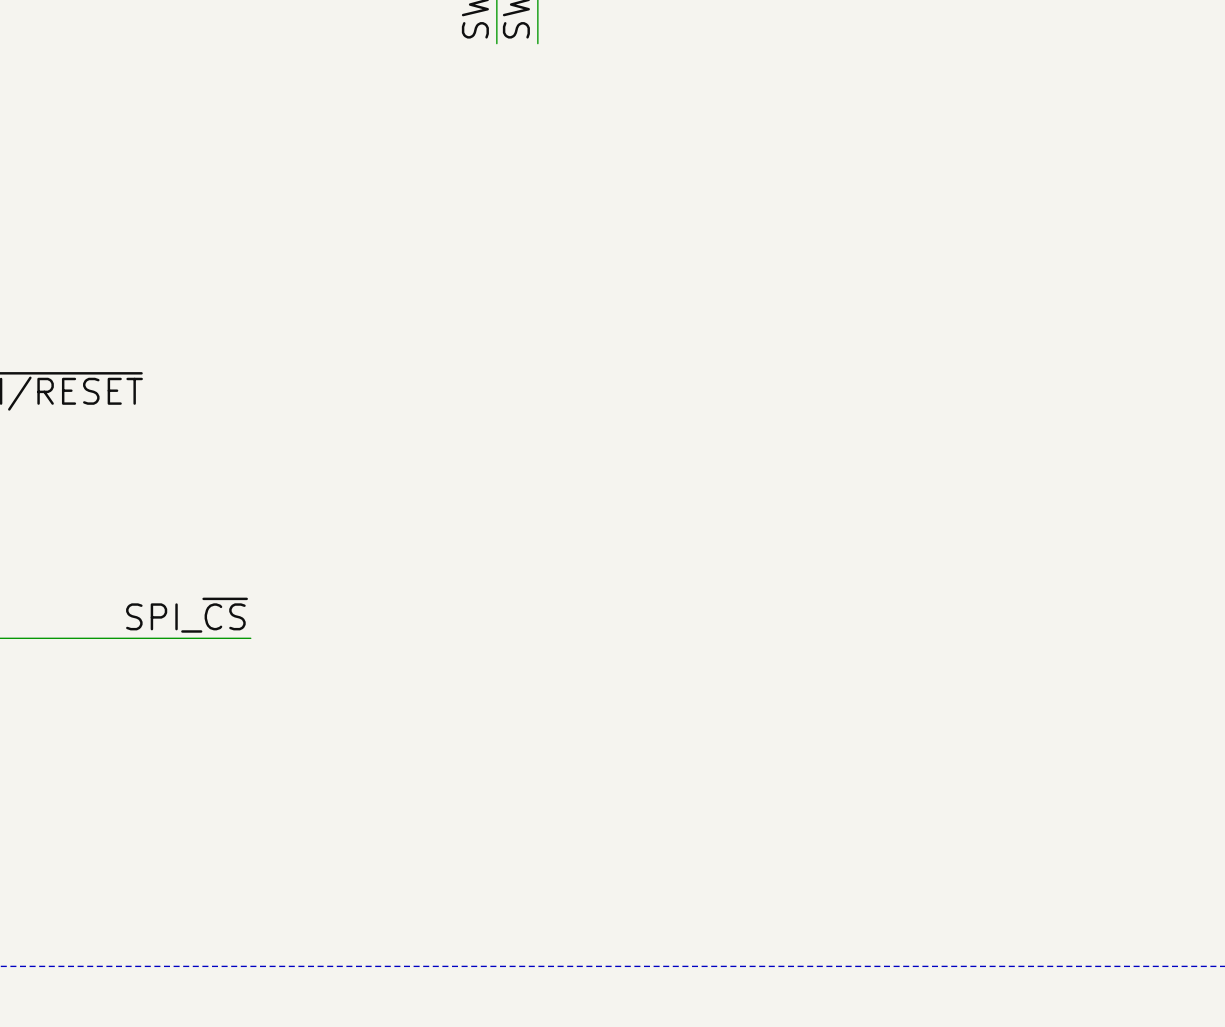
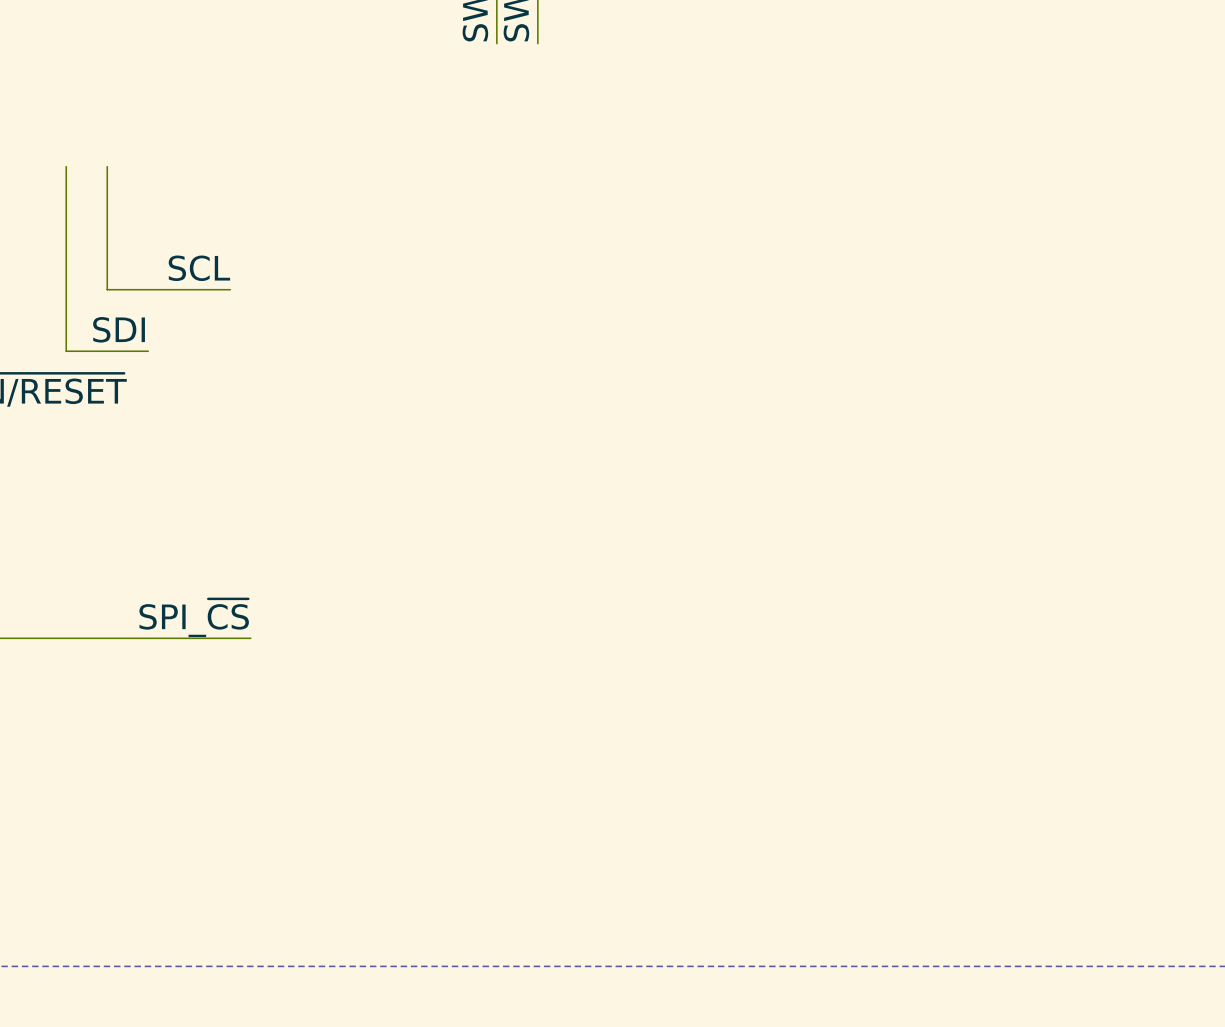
wire: none -> (66, 166) (66, 351) (148, 351)
wire: none -> (107, 166) (107, 289) (230, 289)
label: none -> SCL (199, 268)
label: none -> SDI (119, 329)

